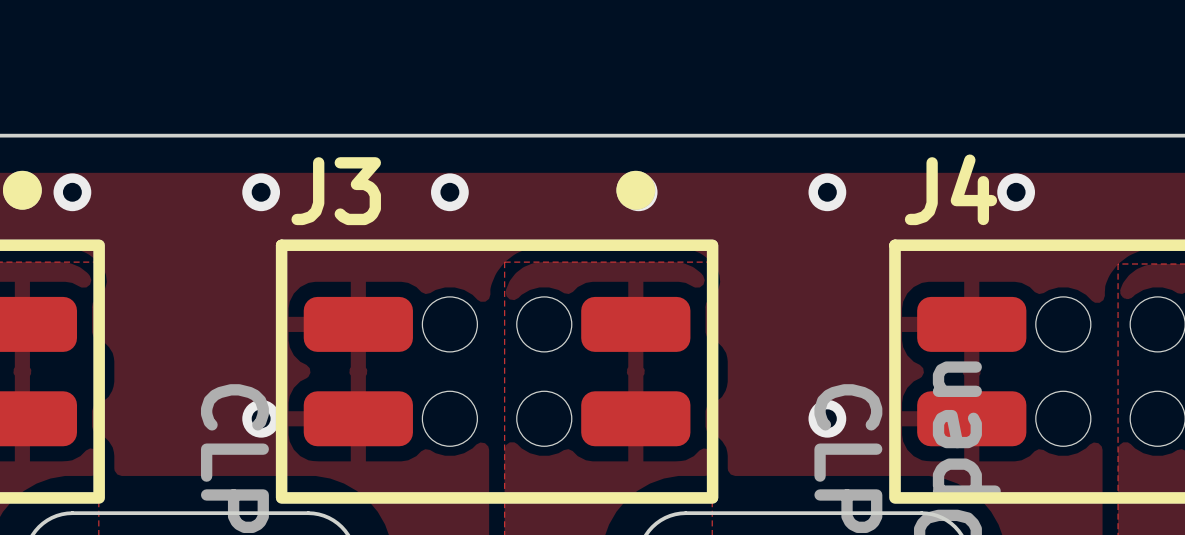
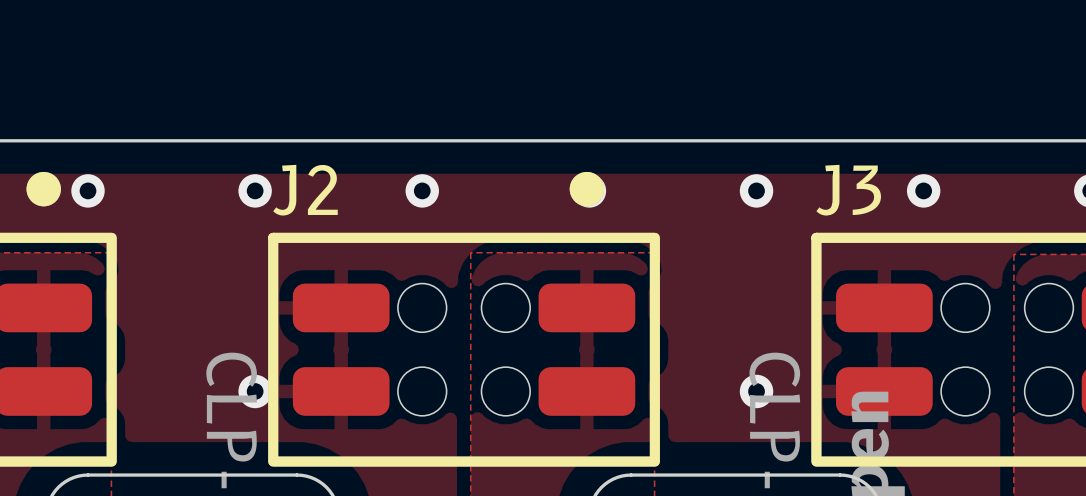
J4 name: J4 (950, 189) -> J3 (848, 190)
J3 name: J3 (336, 191) -> J2 (305, 190)

